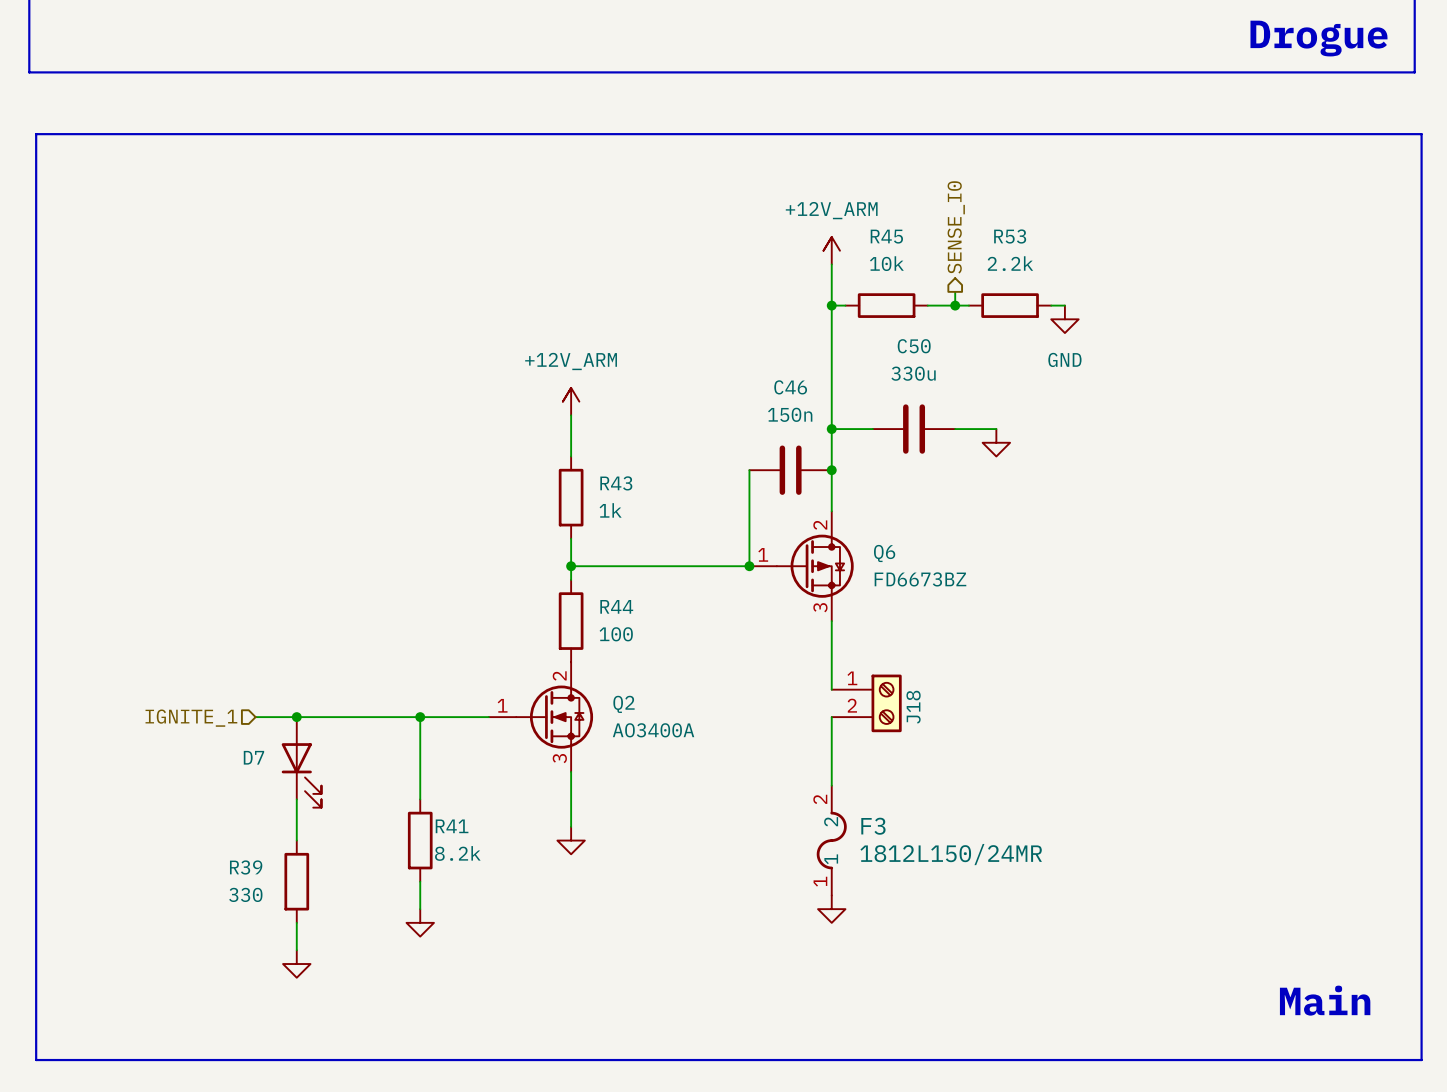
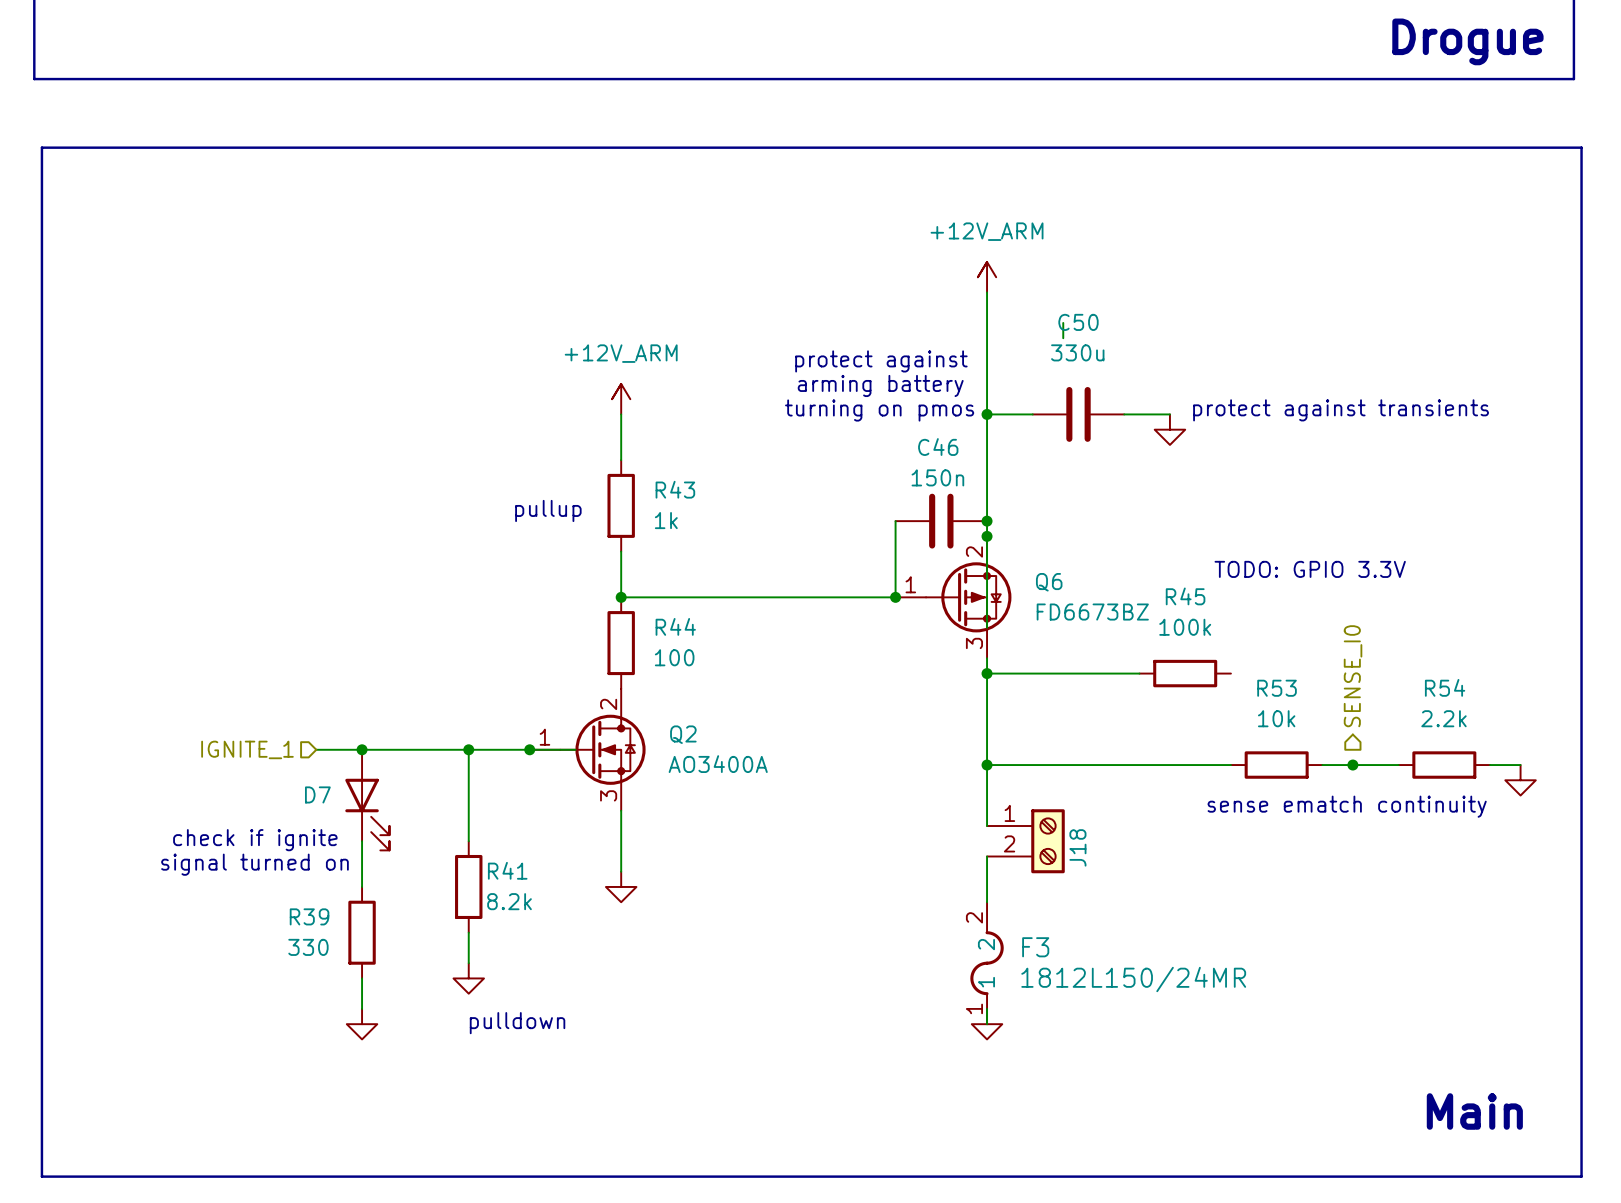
hierarchical label: SENSE_I0 (956, 227) -> none
power symbol position: +12V_ARM (831, 250) -> +12V_ARM (987, 277)
R45 value: 10k (886, 263) -> 100k (1185, 627)
R53 value: 2.2k (1010, 263) -> 10k (1276, 718)
wire: (831, 264) (831, 511) -> none
wire: none -> (987, 292) (987, 627)
wire: (831, 305) (845, 305) -> none
junction: (831, 305) -> none
R45 position: (886, 305) -> (1185, 673)
wire: (927, 305) (968, 305) -> none
junction: (955, 305) -> none
R53 position: (1010, 305) -> (1276, 765)
wire: (1051, 305) (1064, 305) -> none
power symbol: GND (1064, 319) -> none
text: none -> protect against (881, 361)
text: none -> arming battery (880, 385)
text: none -> turning on pmos (879, 410)
text: none -> protect against transients (1341, 410)
junction: none -> (987, 414)
C46 name position: C46 (790, 387) -> C46 (938, 447)
power symbol position: +12V_ARM (571, 401) -> +12V_ARM (621, 399)
C46 value position: 150n (790, 414) -> 150n (937, 477)
wire: (571, 415) (571, 456) -> (621, 414) (621, 460)
wire: (831, 429) (872, 429) -> (987, 414) (1032, 414)
junction: (831, 429) -> none
C50 position: (914, 429) -> (1078, 414)
wire: (955, 429) (996, 429) -> (1124, 414) (1169, 414)
power symbol position: (996, 442) -> (1169, 429)
text: none -> pullup (548, 510)
wire: (749, 470) (749, 566) (571, 566) -> none
C46 position: (790, 470) -> (941, 521)
wire: none -> (895, 521) (895, 597) (621, 597) (621, 551)
junction: (831, 470) -> none
junction: none -> (987, 521)
junction: none -> (987, 536)
R43 position: (571, 497) -> (621, 505)
text: none -> TODO: GPIO 3.3V (1310, 569)
wire: (571, 538) (571, 579) -> none
junction: none -> (895, 597)
junction position: (571, 566) -> (621, 597)
junction: (749, 566) -> none
Q6 position: (801, 566) -> (953, 597)
wire: none -> (987, 658) (987, 826)
wire: none -> (987, 673) (1139, 673)
junction: none -> (987, 673)
hierarchical label: none -> SENSE_I0 (1353, 676)
R44 position: (571, 621) -> (621, 643)
wire: (831, 621) (831, 689) -> none
junction: none -> (468, 749)
junction: none -> (529, 749)
wire: none -> (987, 765) (1230, 765)
junction: none -> (987, 765)
wire: none -> (1322, 765) (1398, 765)
junction: none -> (1352, 765)
R54: none -> 2.2k (1444, 765)
wire: none -> (1490, 765) (1520, 765)
J18 position: (866, 703) -> (1025, 841)
power symbol: none -> (1520, 780)
wire: (255, 717) (488, 717) -> (316, 749) (575, 749)
junction position: (296, 717) -> (362, 749)
junction: (420, 717) -> none
Q2 position: (540, 717) -> (587, 749)
wire: (831, 717) (831, 785) -> none
hierarchical label position: IGNITE_1 (191, 718) -> IGNITE_1 (247, 749)
text: none -> sense ematch continuity (1347, 806)
text: none -> check if ignite (255, 840)
wire: (420, 758) (420, 799) -> (468, 749) (468, 795)
D7 position: (301, 762) -> (367, 800)
wire: (571, 771) (571, 826) -> (621, 810) (621, 871)
wire: none -> (987, 856) (987, 902)
text: none -> signal turned on (254, 864)
wire: (296, 799) (296, 840) -> (362, 841) (362, 886)
R41 position: (420, 840) -> (468, 886)
power symbol position: (571, 840) -> (621, 886)
F3 position: (831, 840) -> (987, 963)
R39 position: (296, 881) -> (362, 932)
wire: (420, 881) (420, 909) -> (468, 932) (468, 963)
power symbol position: (831, 909) -> (987, 1024)
wire: none -> (987, 1008) (987, 1024)
text: none -> pulldown (517, 1023)
wire: (296, 922) (296, 950) -> (362, 978) (362, 1008)
power symbol: none -> (362, 1024)
power symbol position: (420, 922) -> (468, 978)
power symbol: (296, 964) -> none

